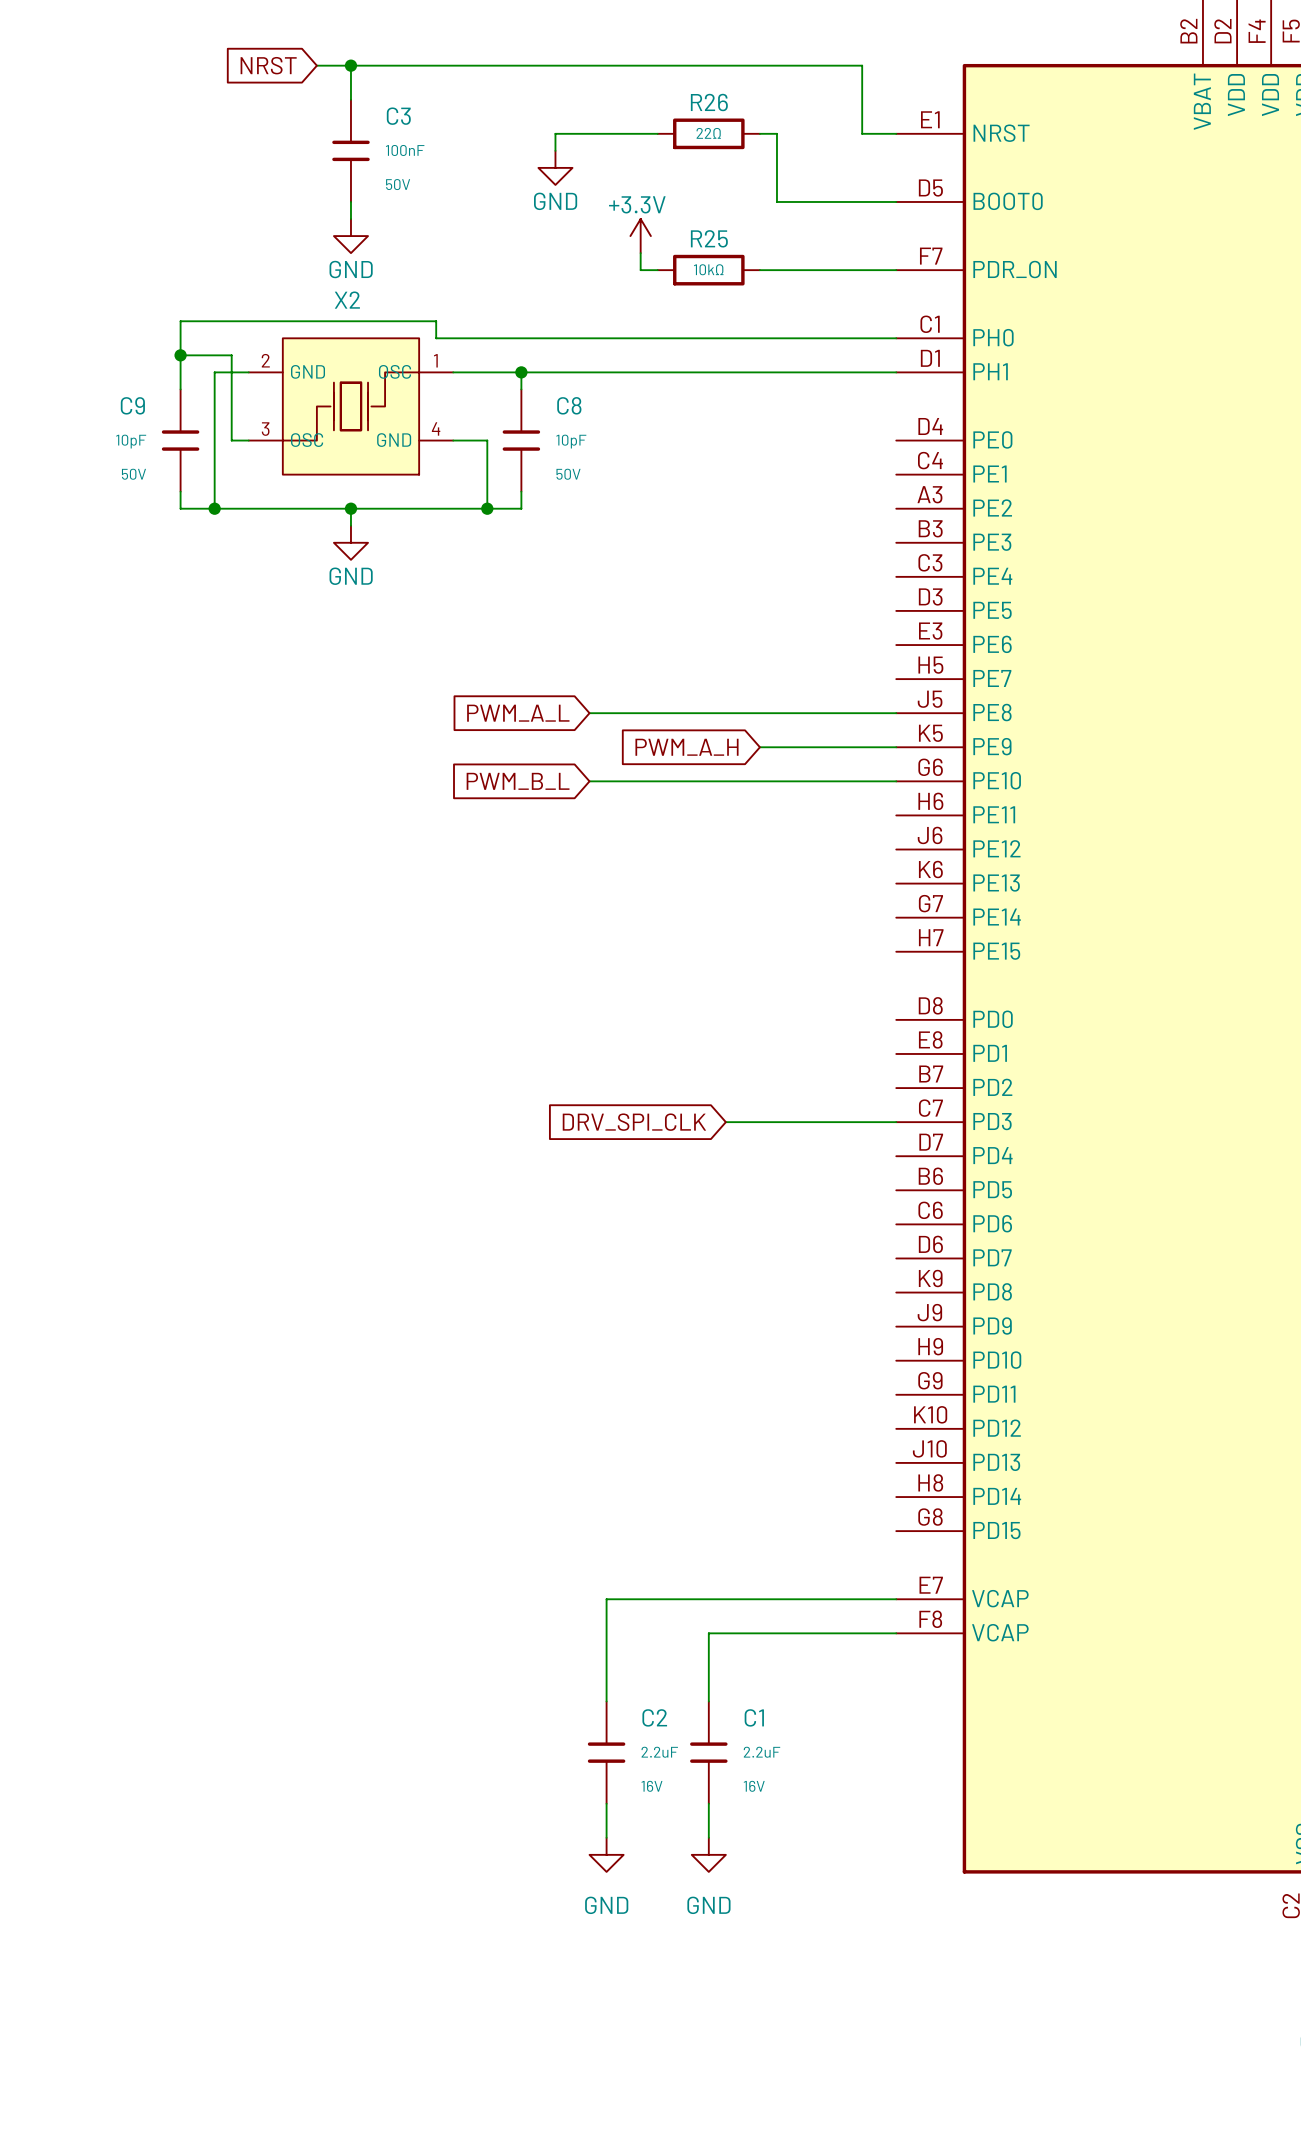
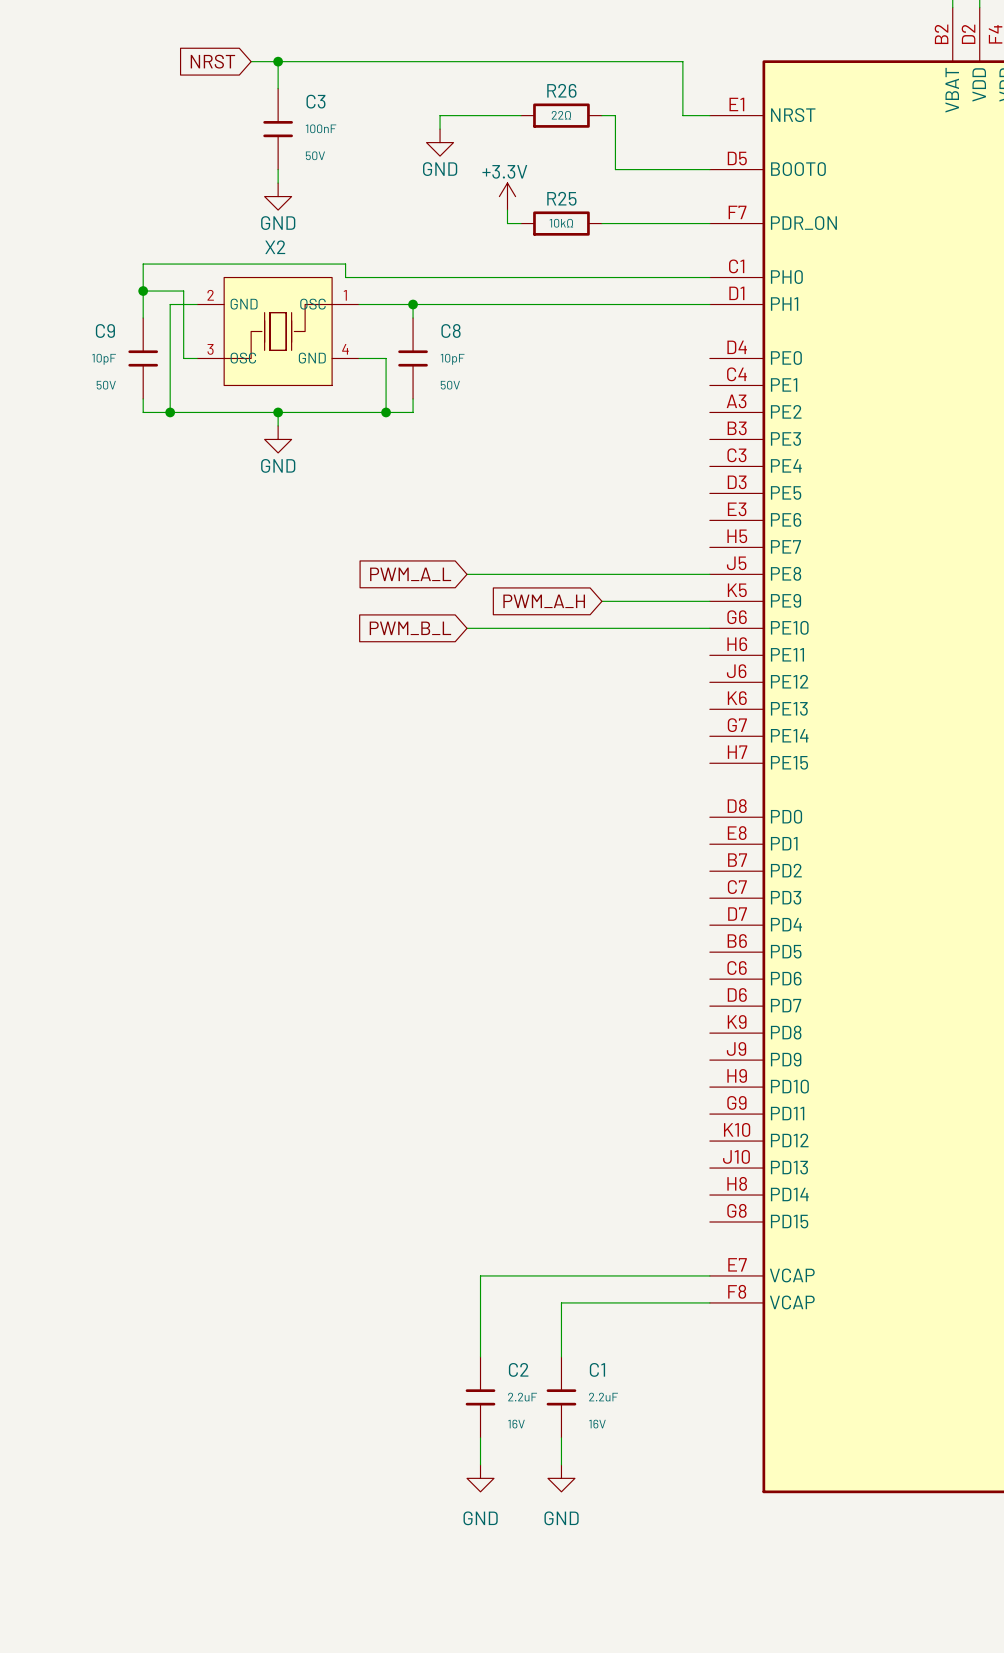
global label: DRV_SPI_CLK (634, 1122) -> none
wire: (725, 1122) (896, 1122) -> none

